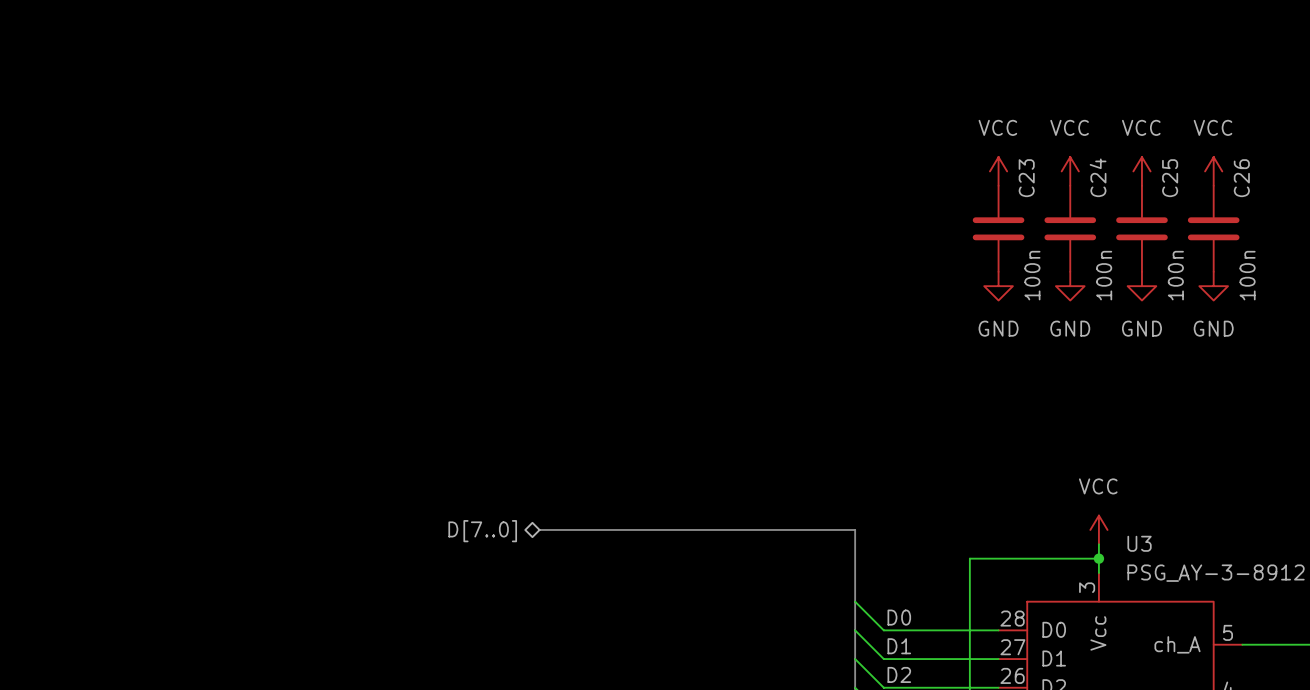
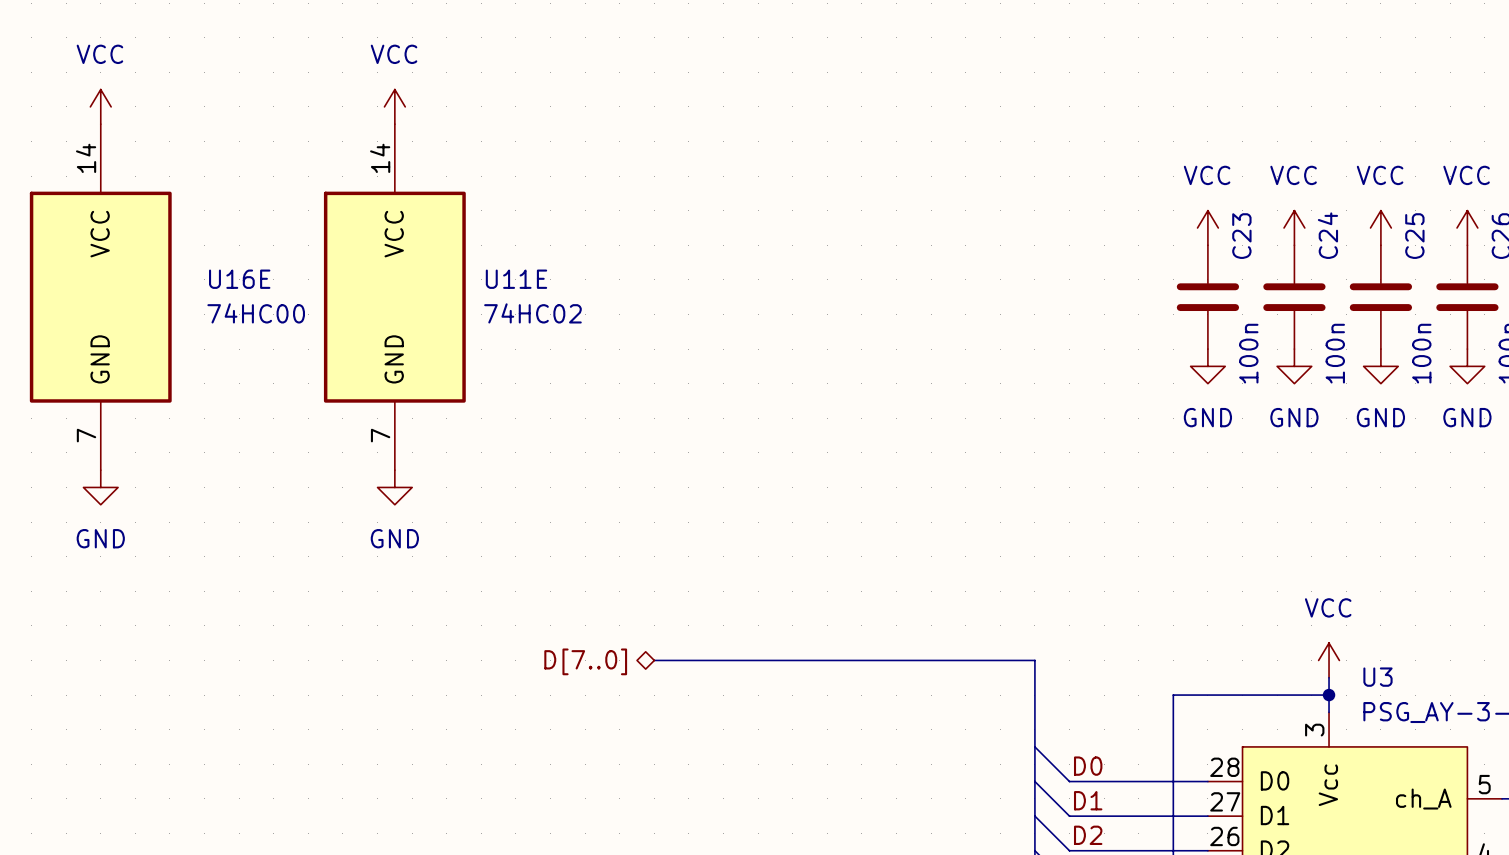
power symbol: none -> VCC (100, 106)
power symbol: none -> VCC (394, 106)
U16E: none -> 74HC00 (100, 297)
U11E: none -> 74HC02 (394, 297)
power symbol: none -> GND (100, 487)
power symbol: none -> GND (394, 487)

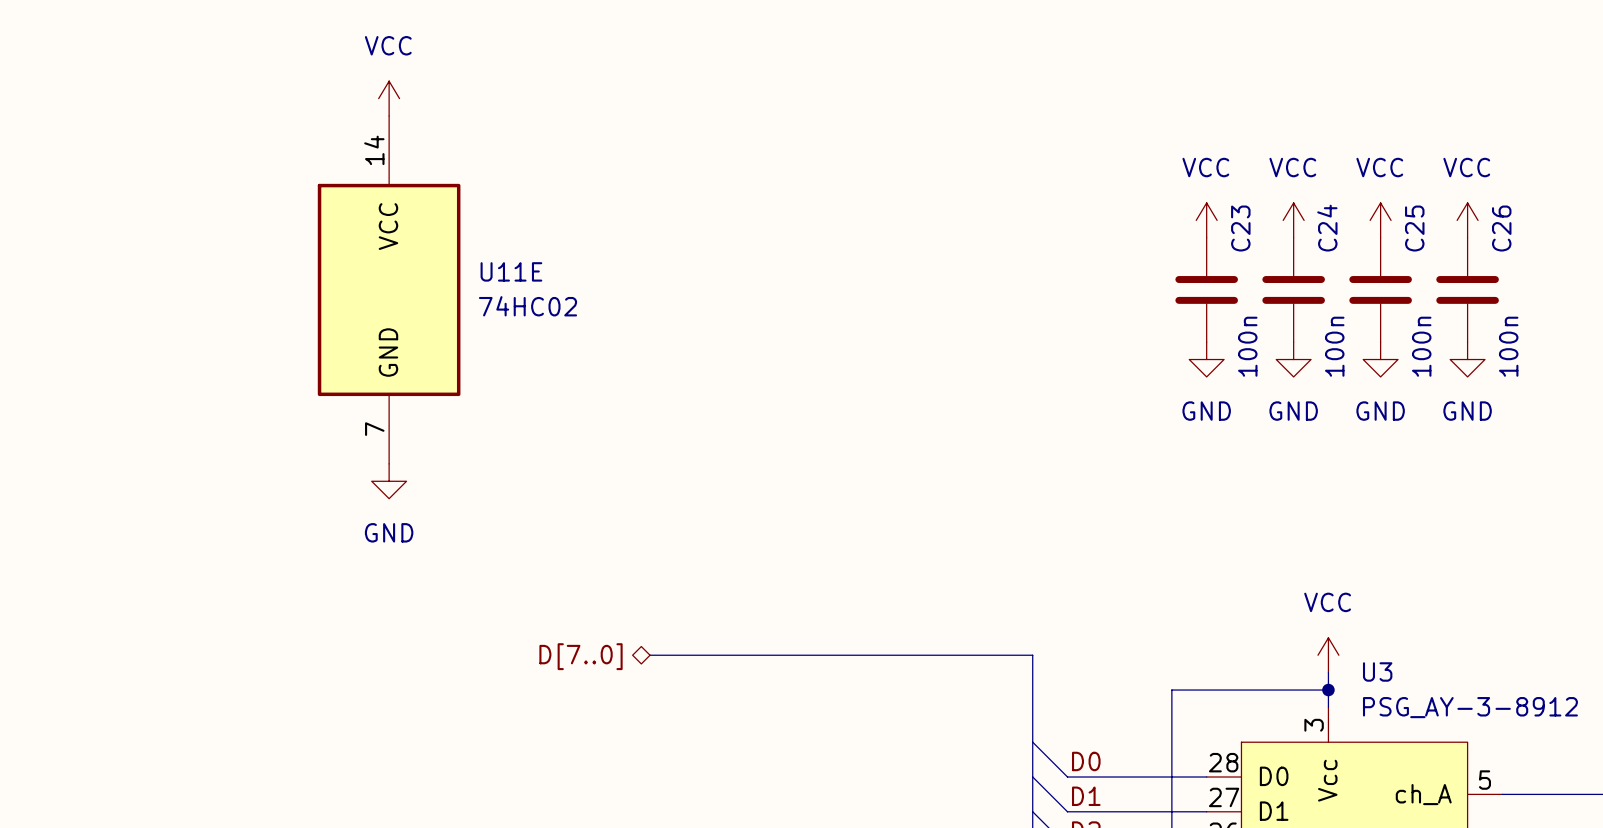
power symbol: VCC (100, 106) -> none
U16E: 74HC00 (100, 297) -> none
power symbol: GND (100, 487) -> none

